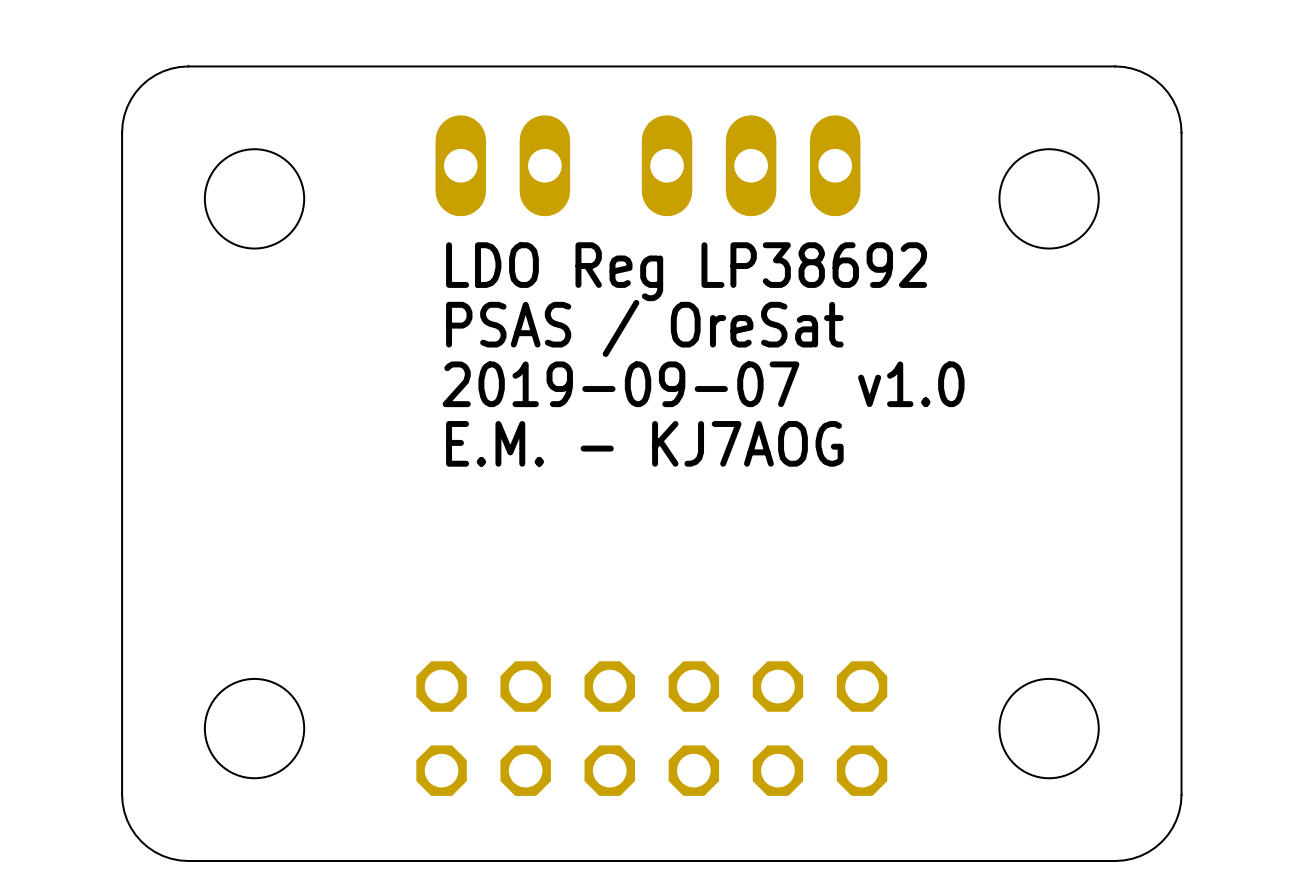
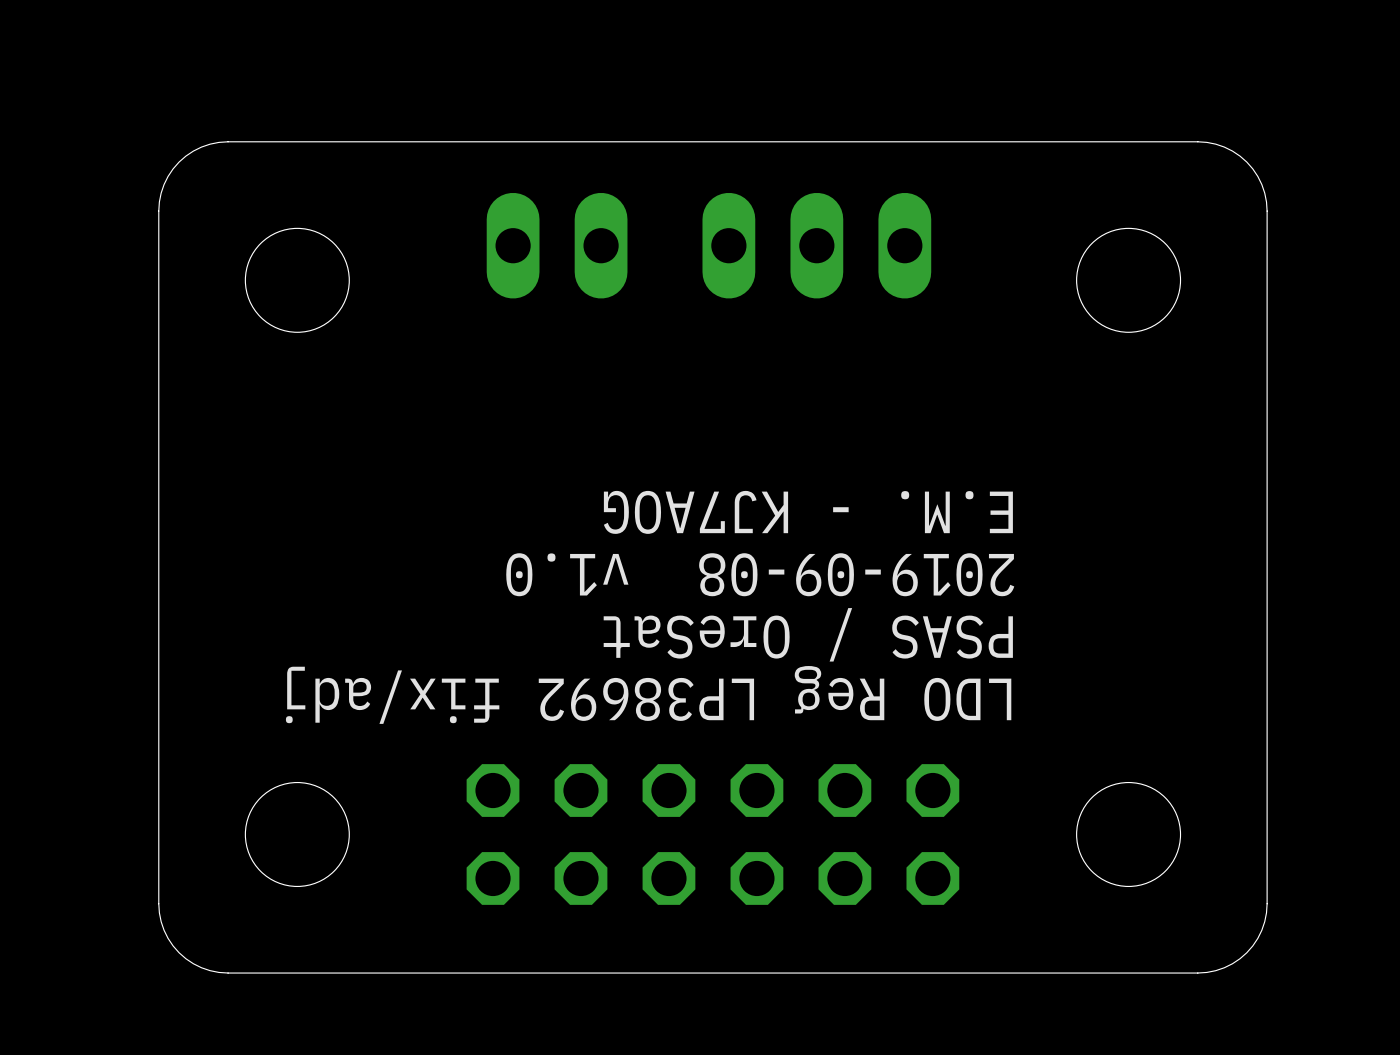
text: LDO Reg LP38692 (686, 271) -> none
text rotation: 0° (644, 328) -> 180° (808, 634)
text: 2019-09-07 v1.0 (703, 384) -> none
text rotation: 0° (644, 443) -> 180° (808, 512)
text: none -> 2019-09-08 v1.0 (760, 574)
text: none -> LDO Reg LP38692 fix/adj (648, 694)

